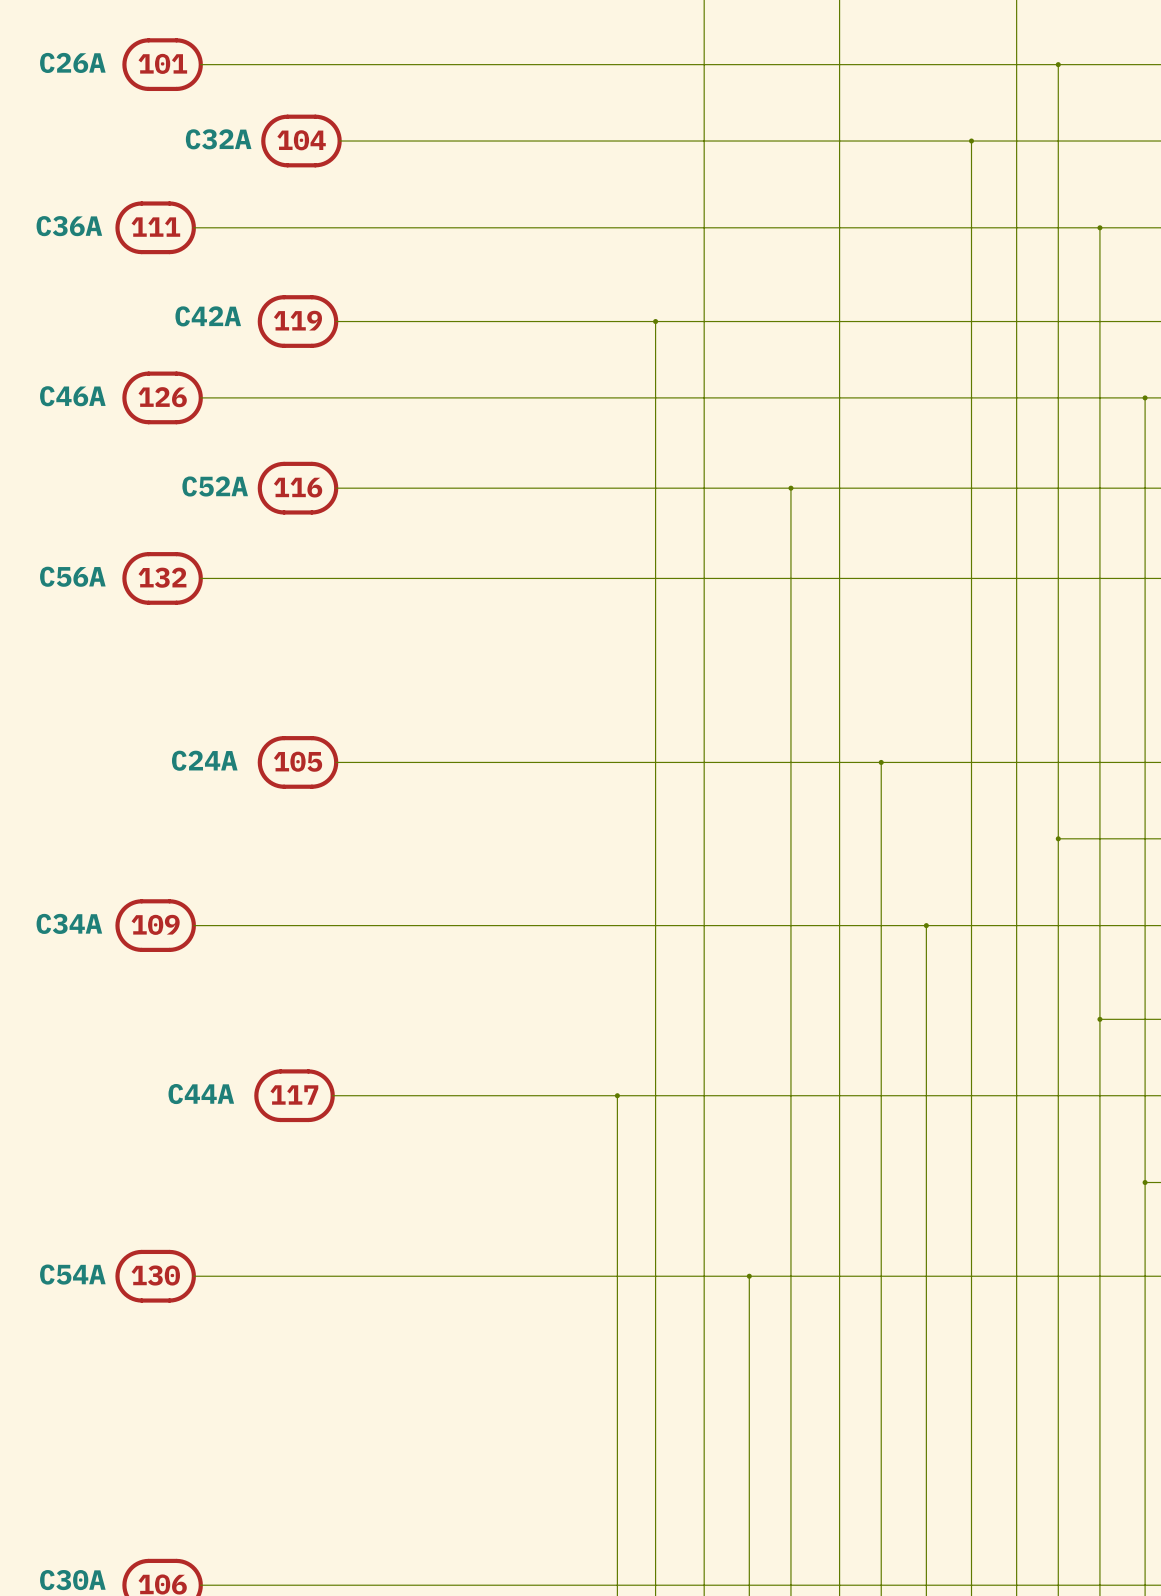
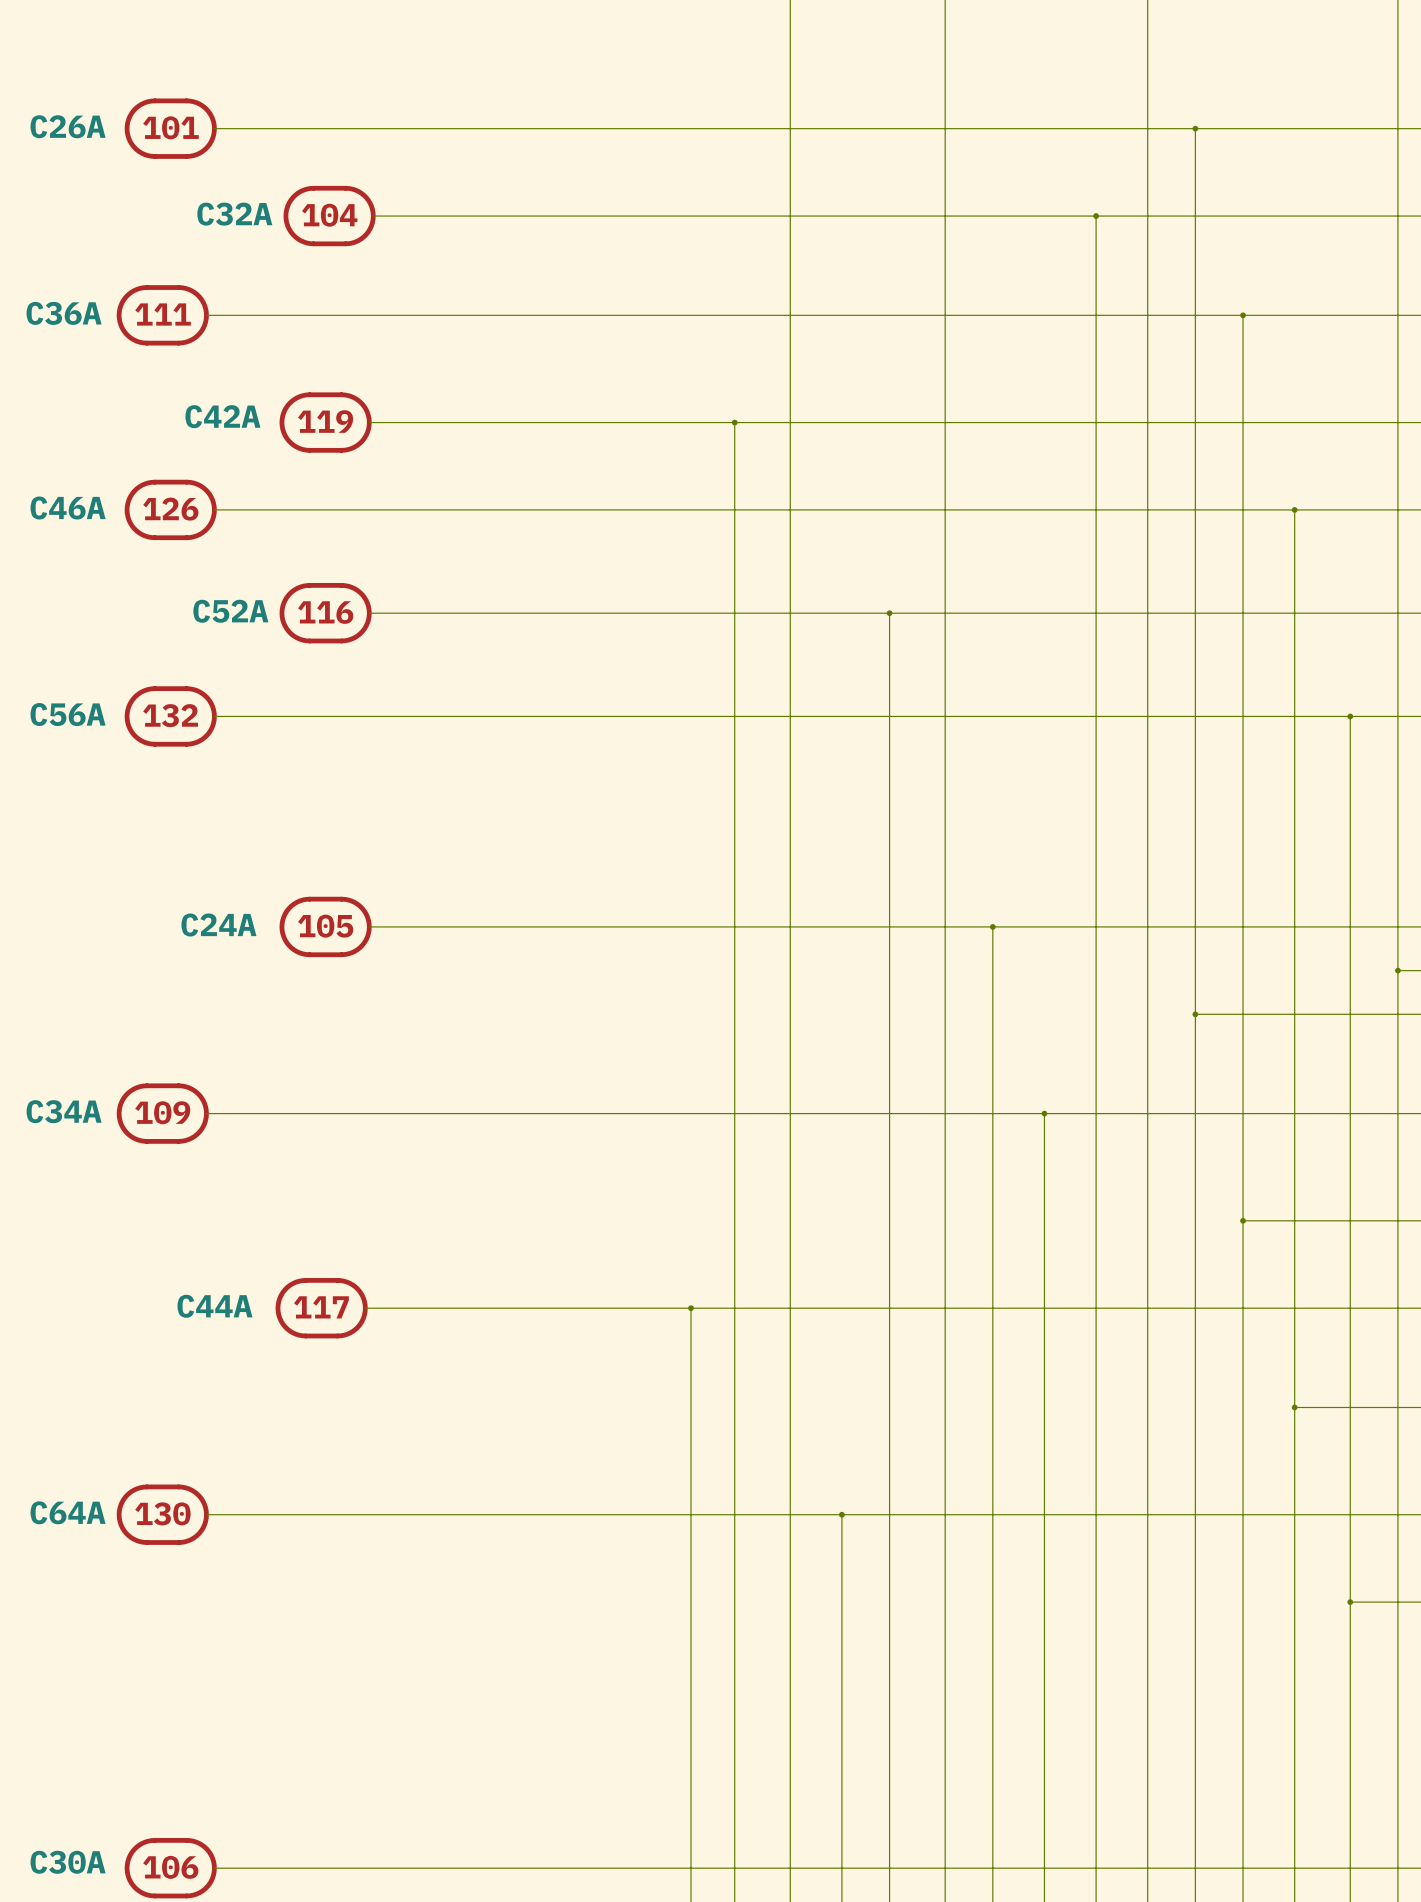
part text: C54A (72, 1274) -> C64A (68, 1512)

